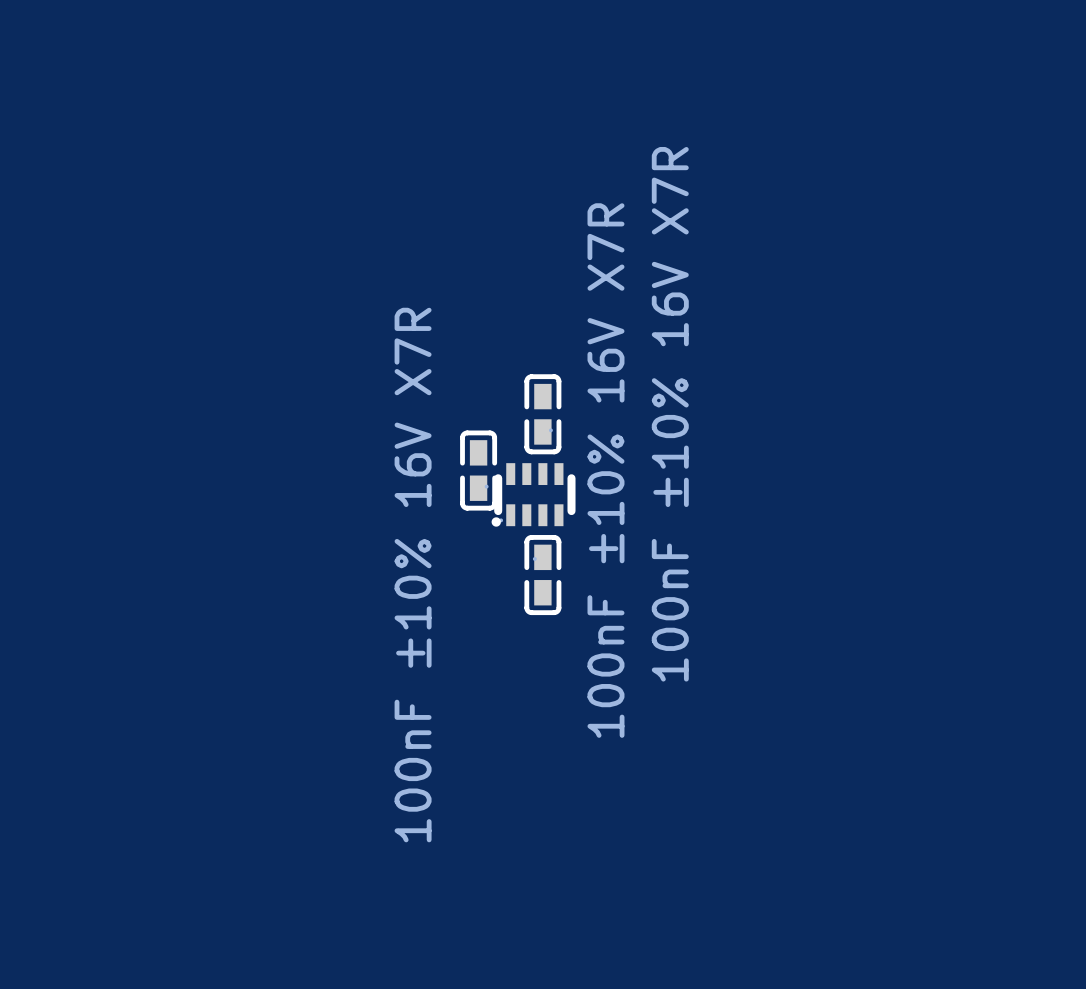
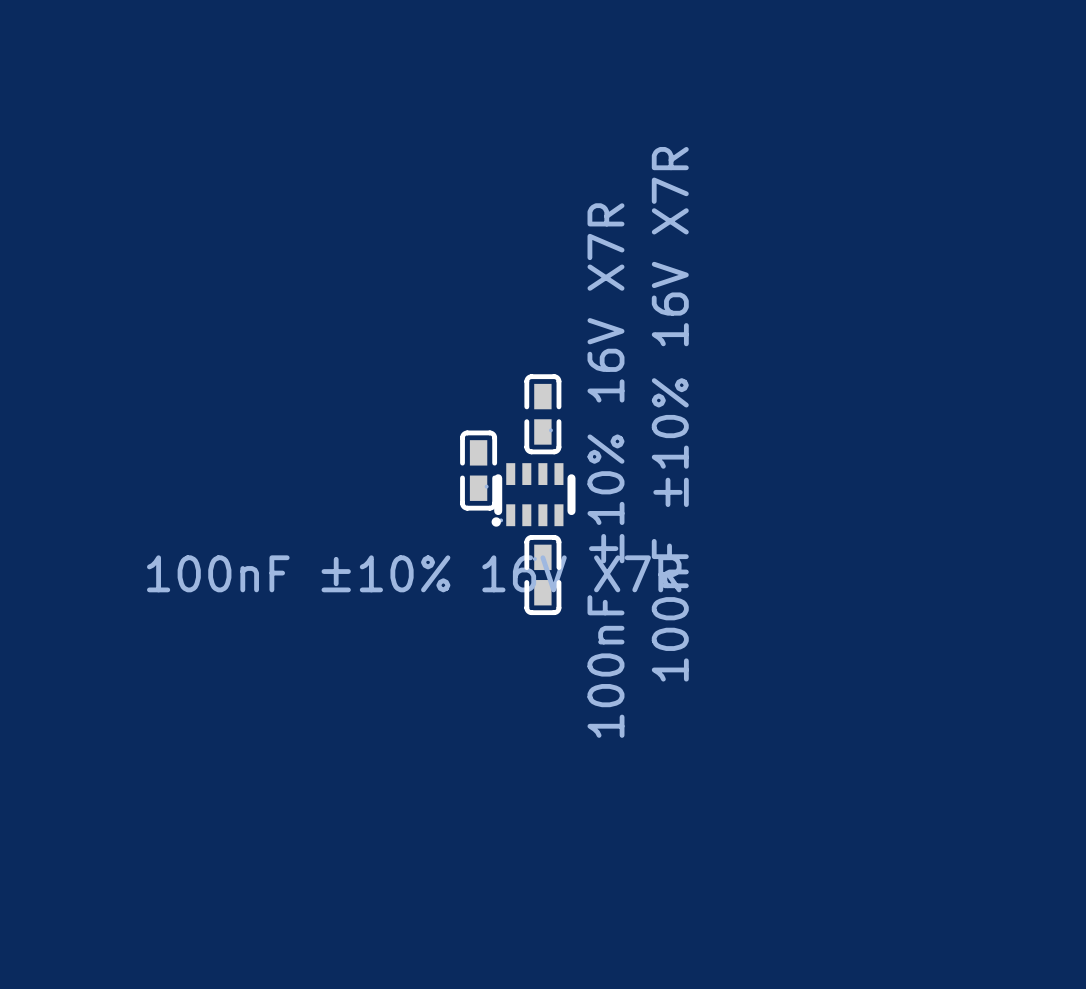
part value rotation: 0° (413, 575) -> 90° clockwise (414, 573)

